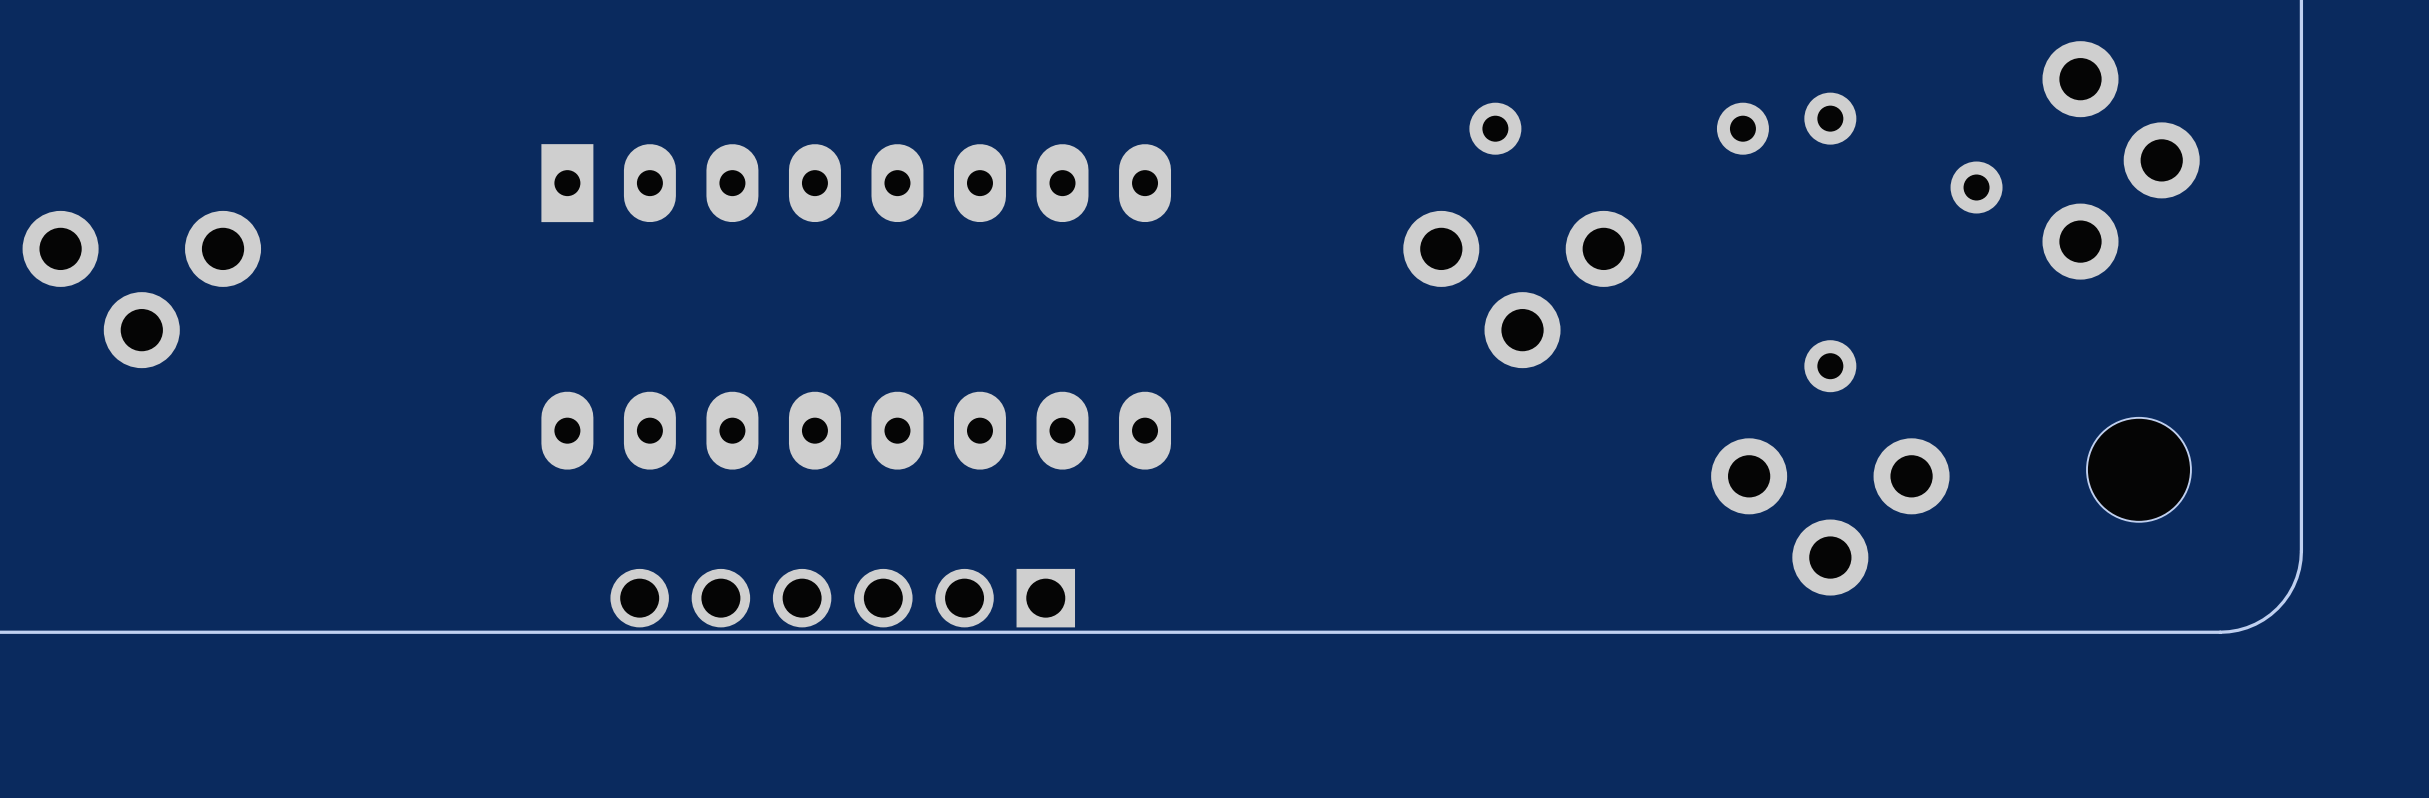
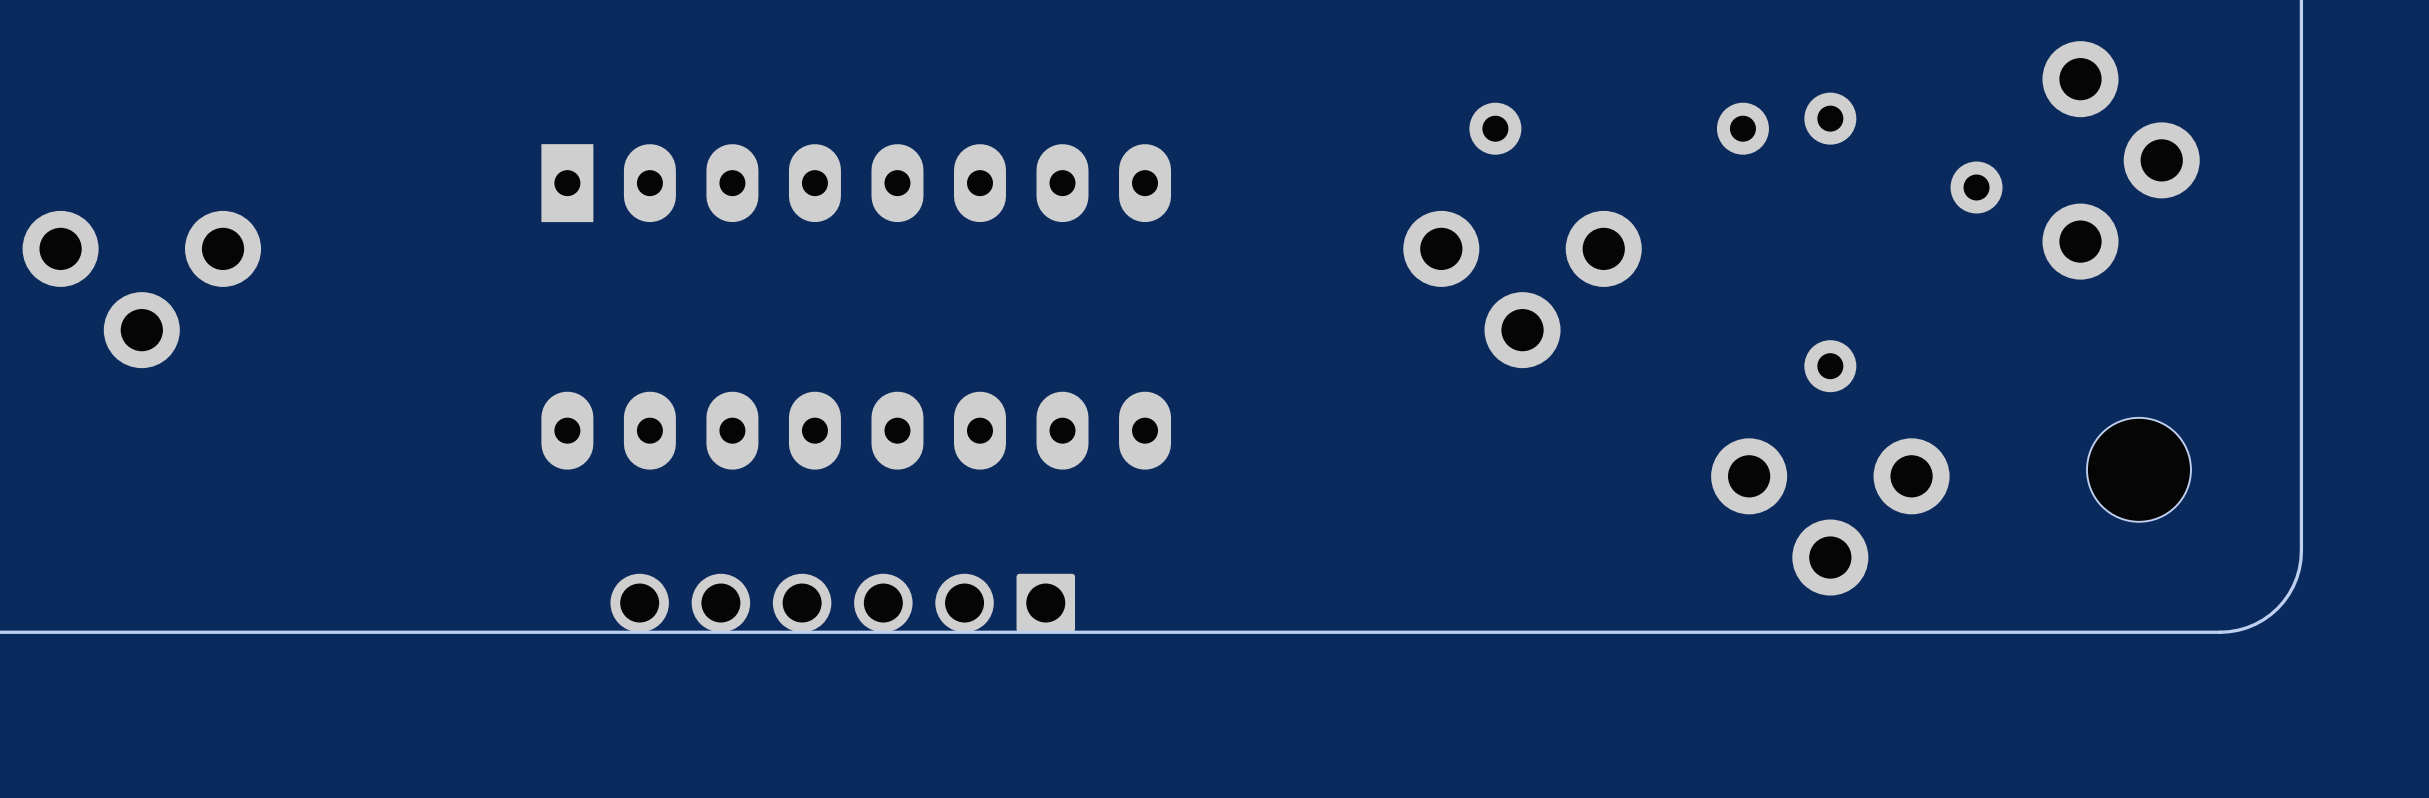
part footprint: [610, 568, 1076, 628] -> [610, 573, 1076, 633]

